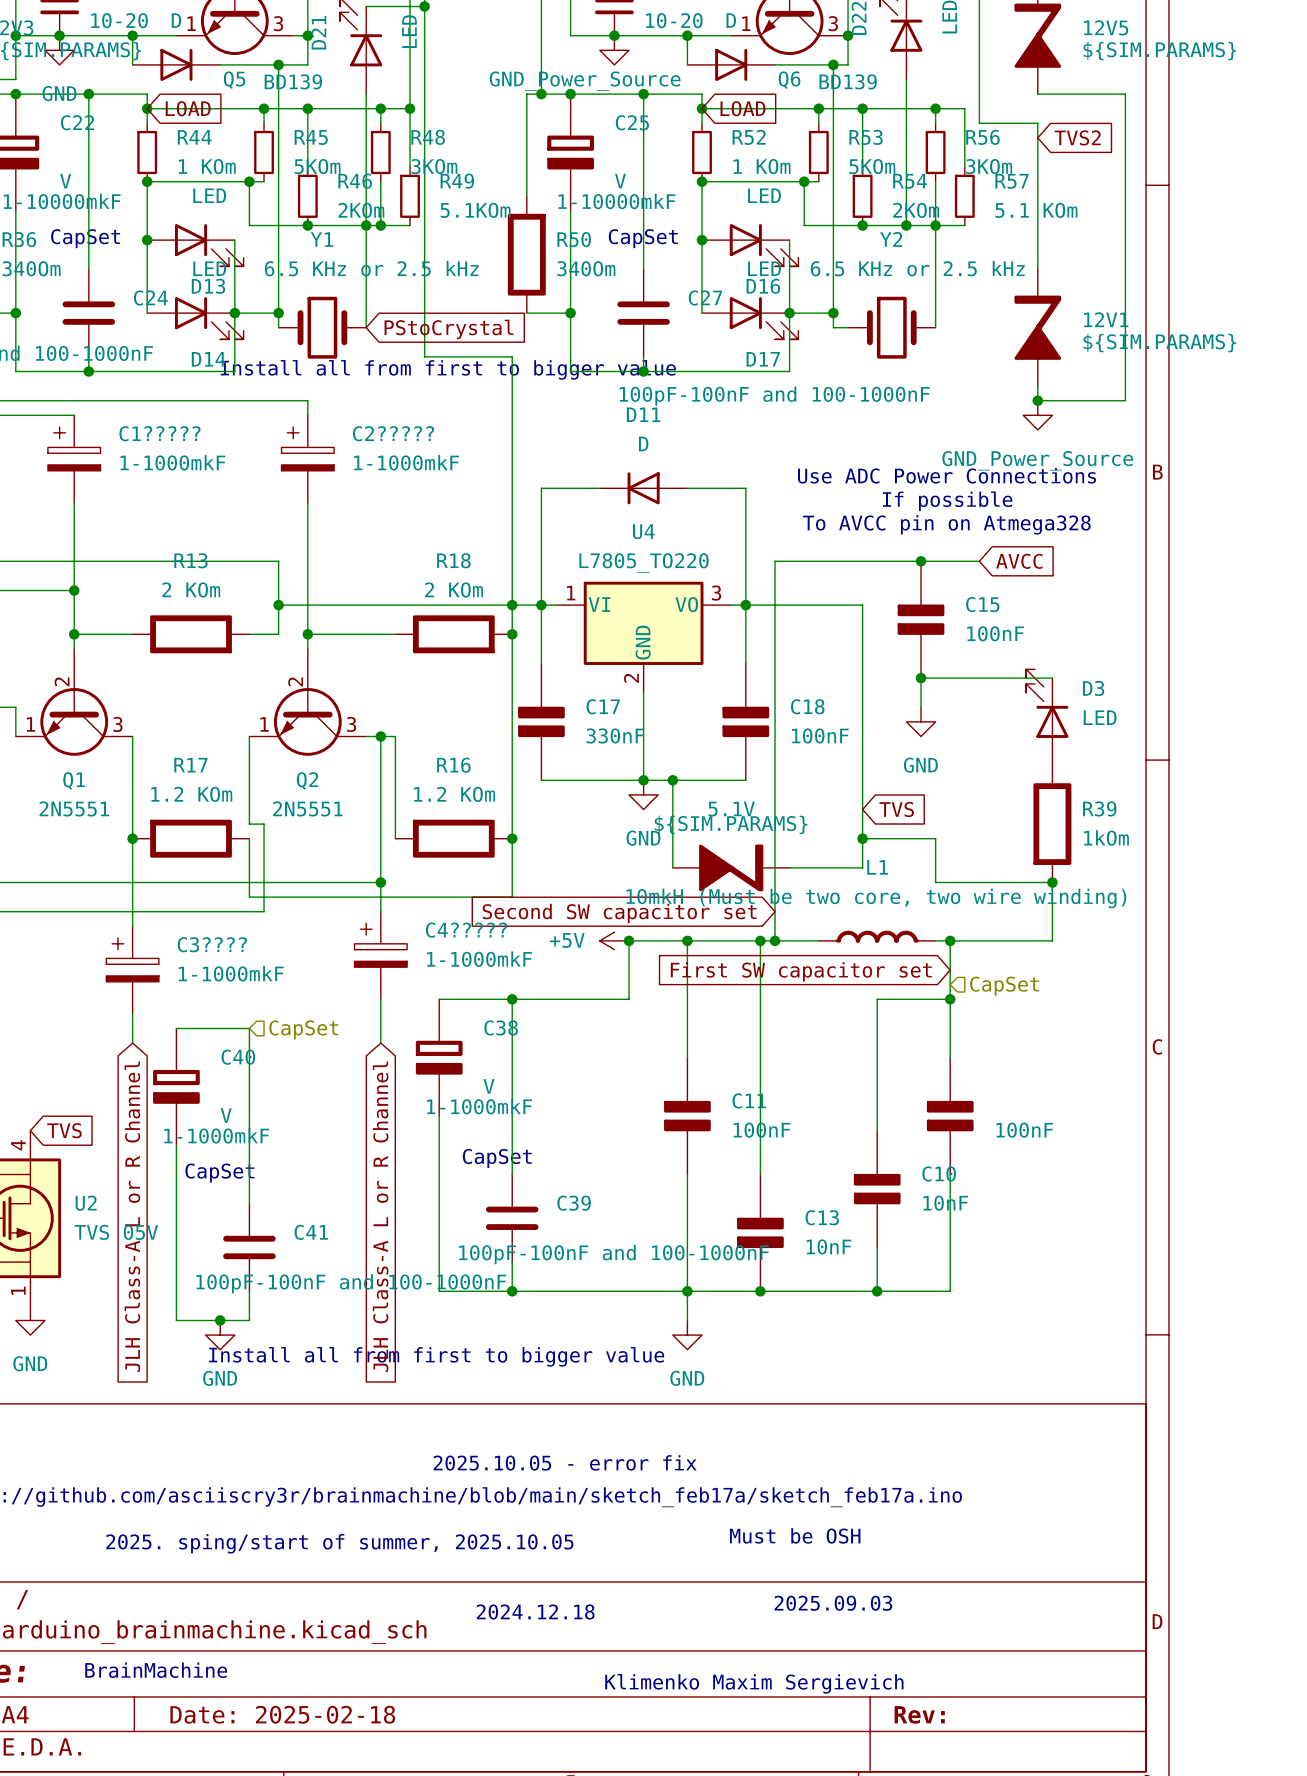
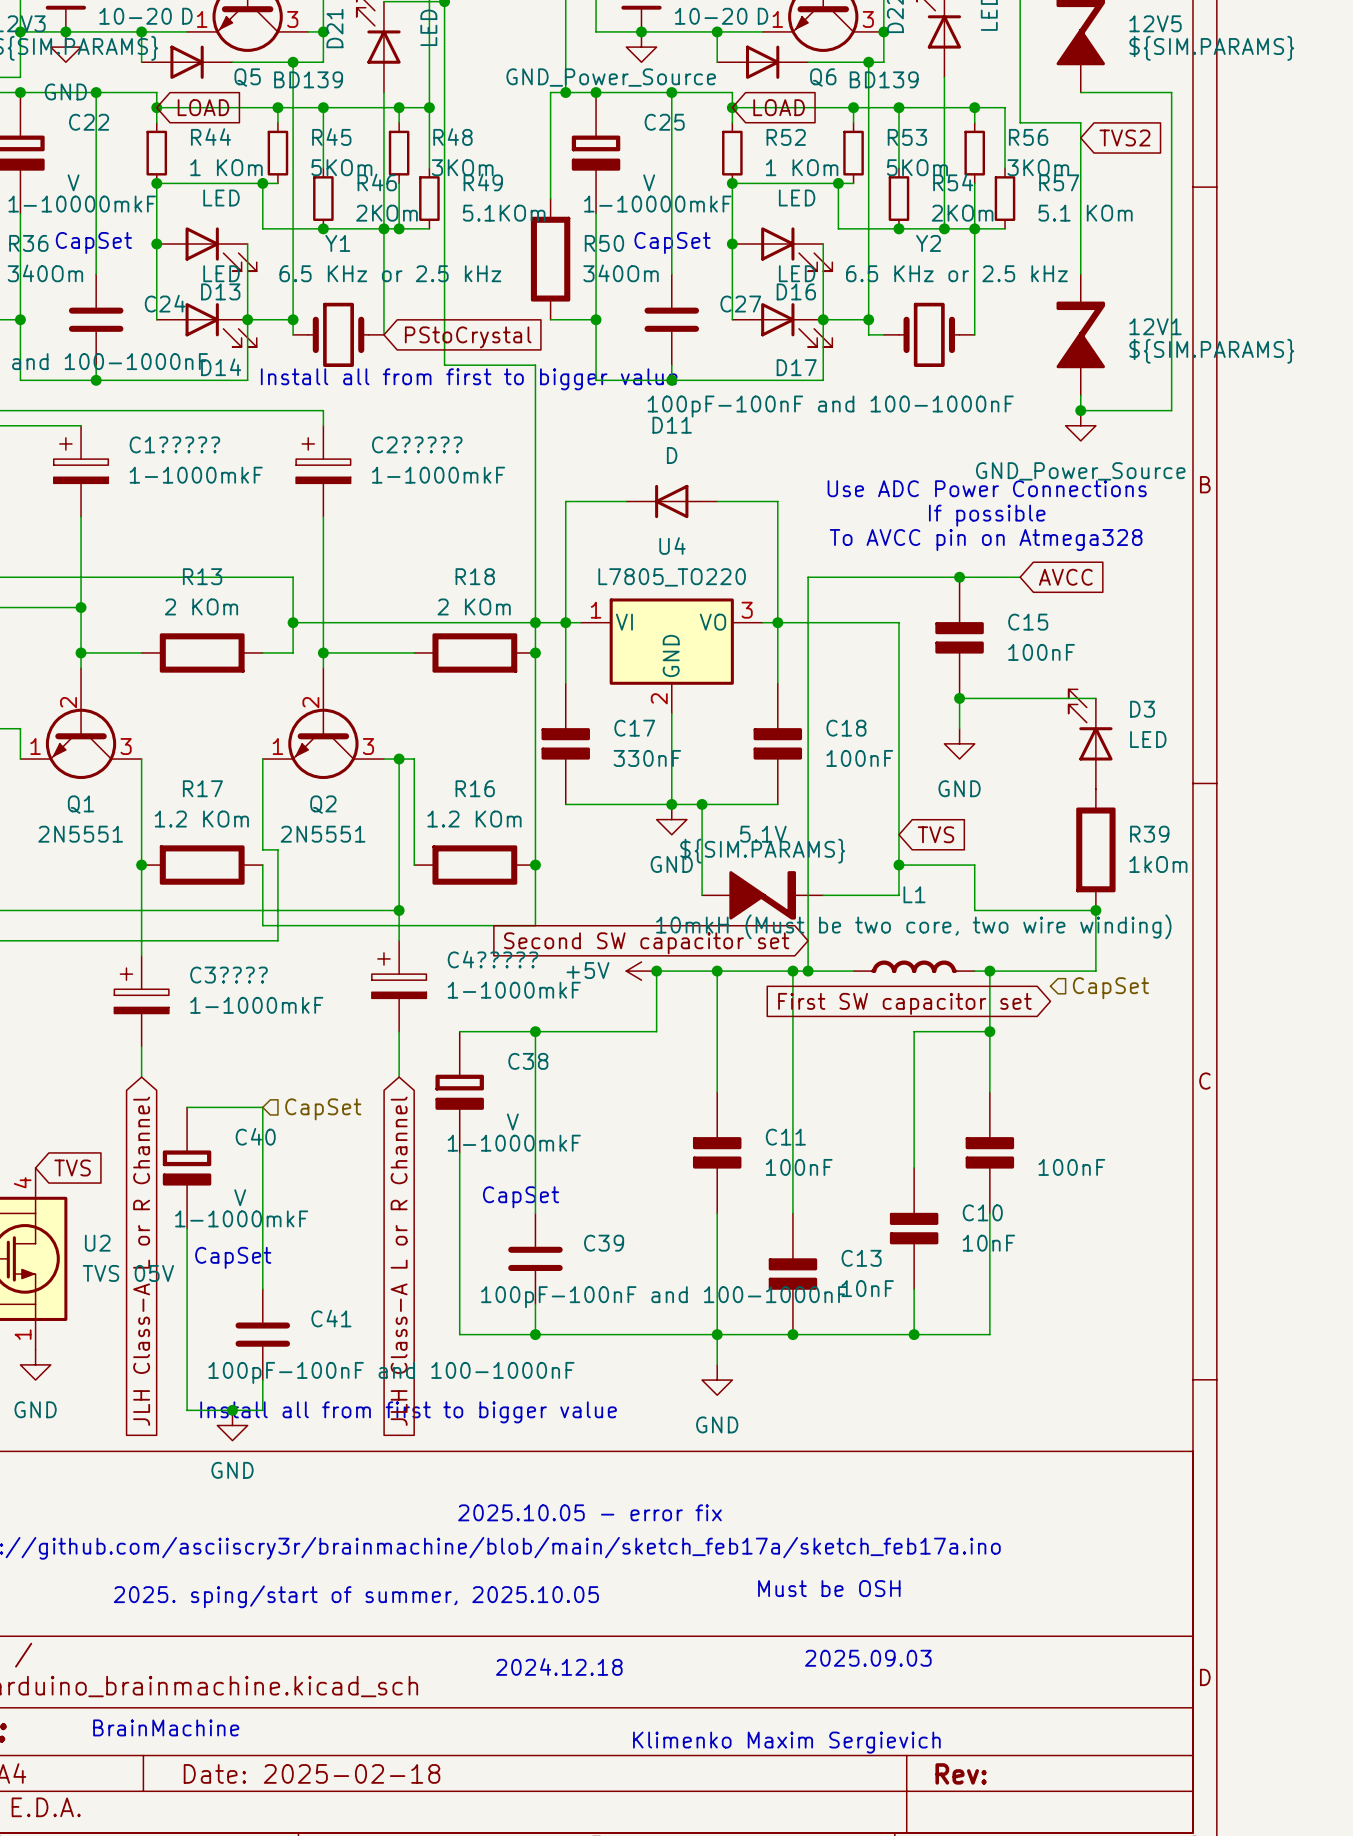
global label position: First SW capacitor set (801, 971) -> First SW capacitor set (904, 1003)
hierarchical label position: CapSet (1004, 986) -> CapSet (1110, 988)
wire: (176, 1028) (249, 1028) (249, 1072) -> (187, 1107) (262, 1107)
hierarchical label position: CapSet (303, 1029) -> CapSet (323, 1109)
C40 position: (176, 1086) -> (187, 1167)
text position: CapSet (219, 1173) -> CapSet (233, 1257)
C41 position: (249, 1247) -> (262, 1334)
wire: (249, 1291) (249, 1320) (176, 1320) -> (262, 1380) (262, 1410) (187, 1410) (187, 1364)
junction position: (220, 1320) -> (232, 1410)
power symbol position: GND (220, 1335) -> GND (232, 1425)
text position: Install all from first to bigger value (436, 1356) -> Install all from first to bigger value (408, 1412)

